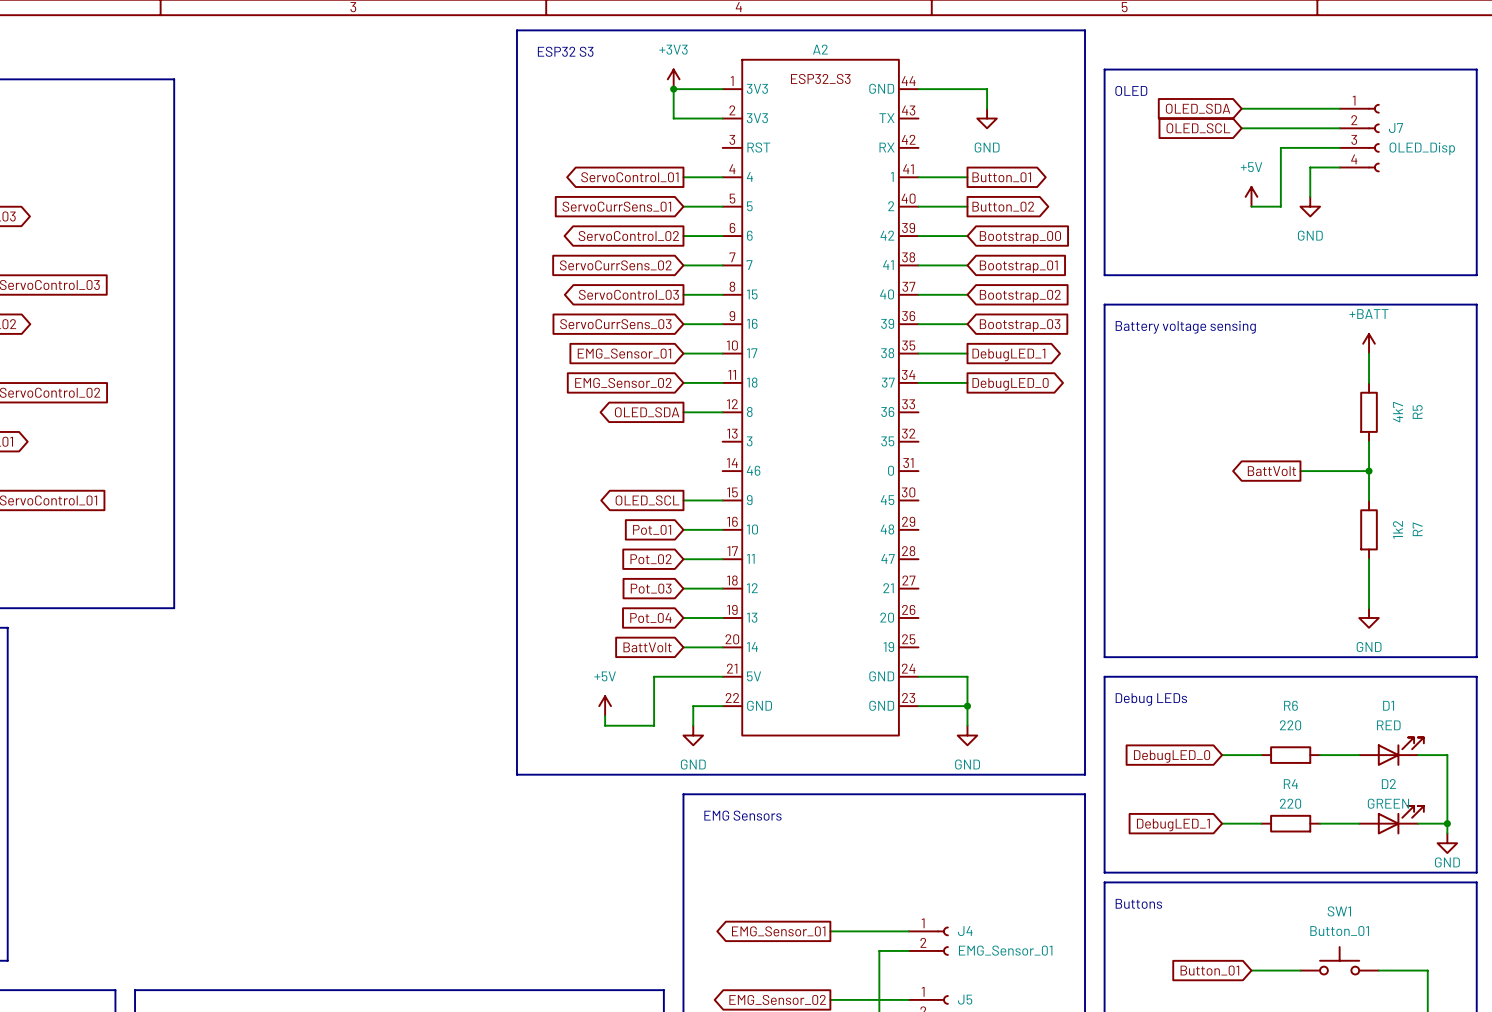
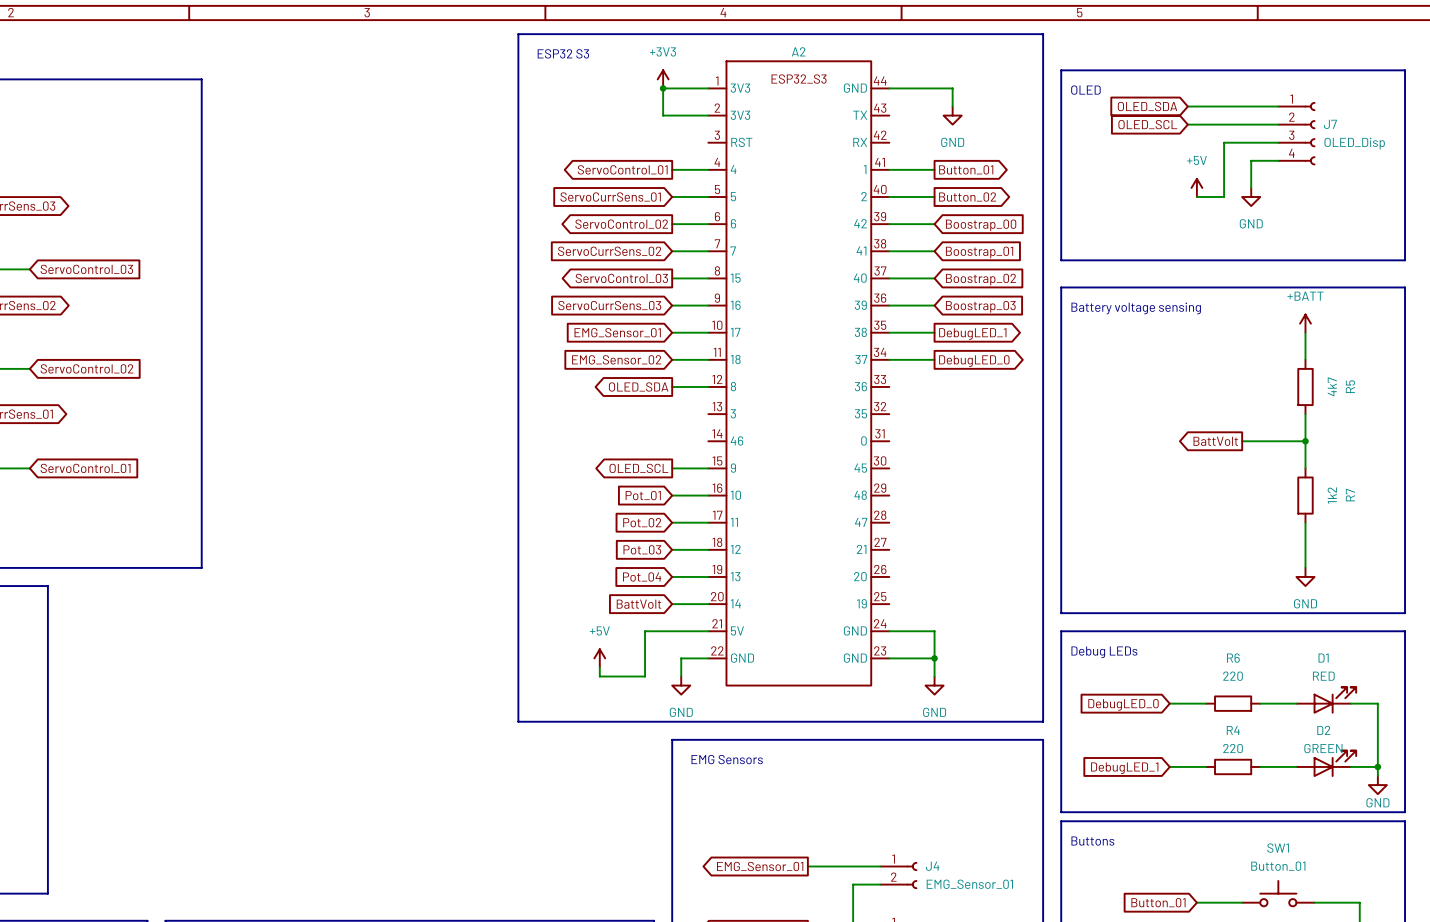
global label: Bootstrap_00 (1020, 237) -> Boostrap_00 (981, 225)
global label: Bootstrap_01 (1018, 266) -> Boostrap_01 (979, 252)
global label: Bootstrap_02 (1020, 296) -> Boostrap_02 (980, 279)
global label: Bootstrap_03 (1020, 325) -> Boostrap_03 (980, 306)

